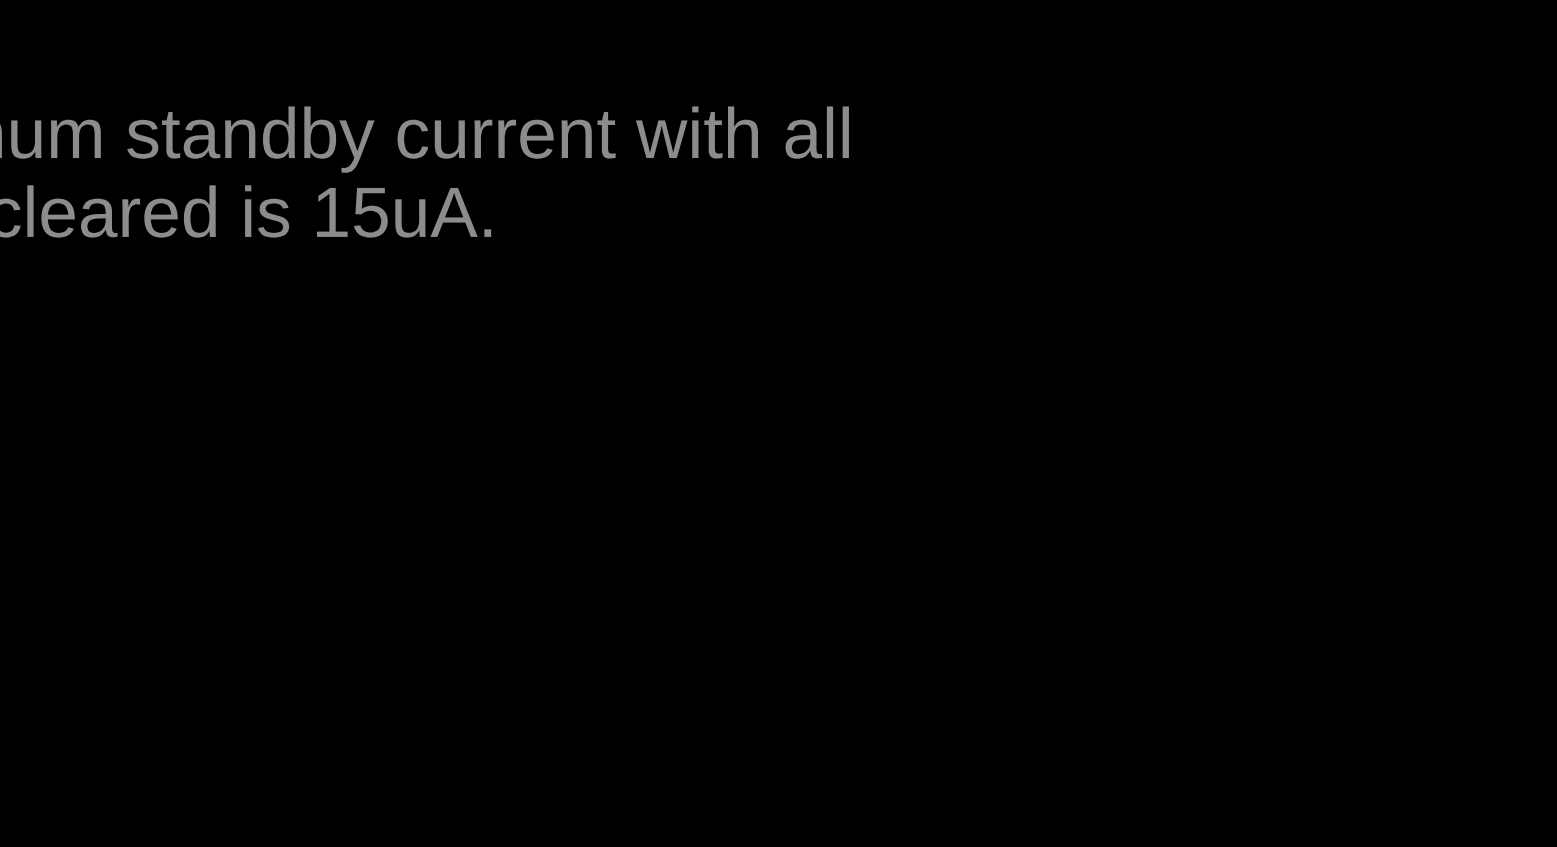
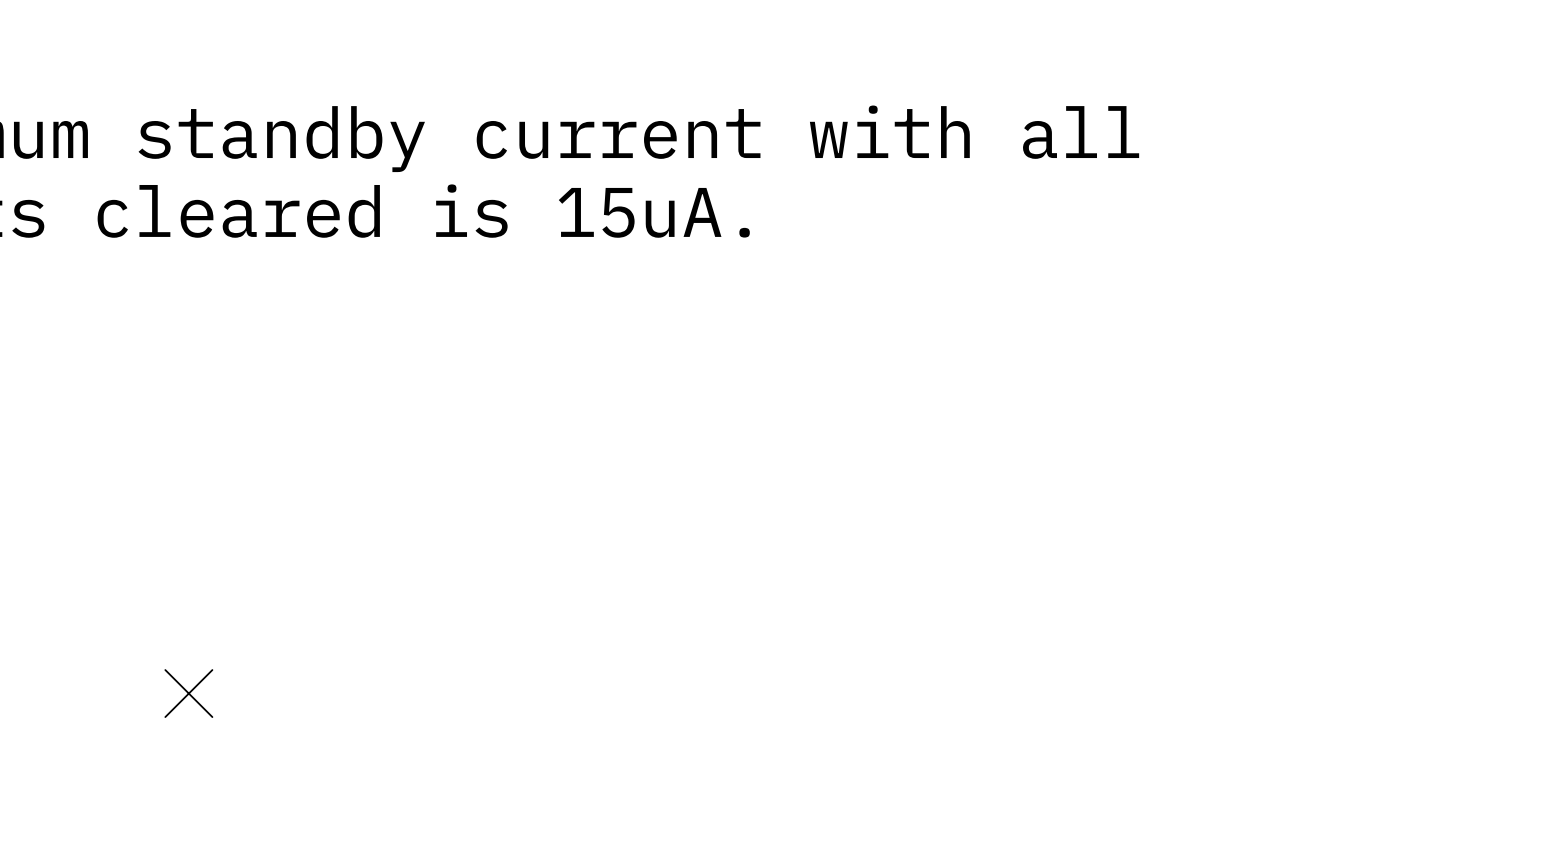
no-connect mark: none -> (188, 693)

